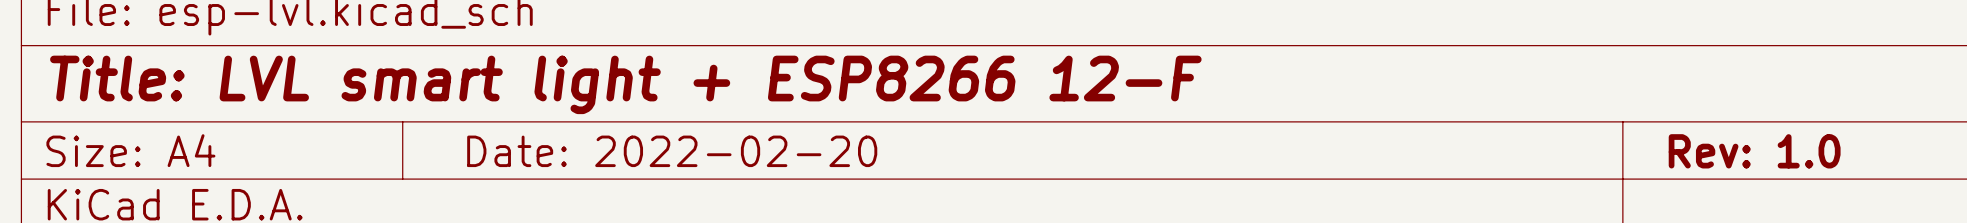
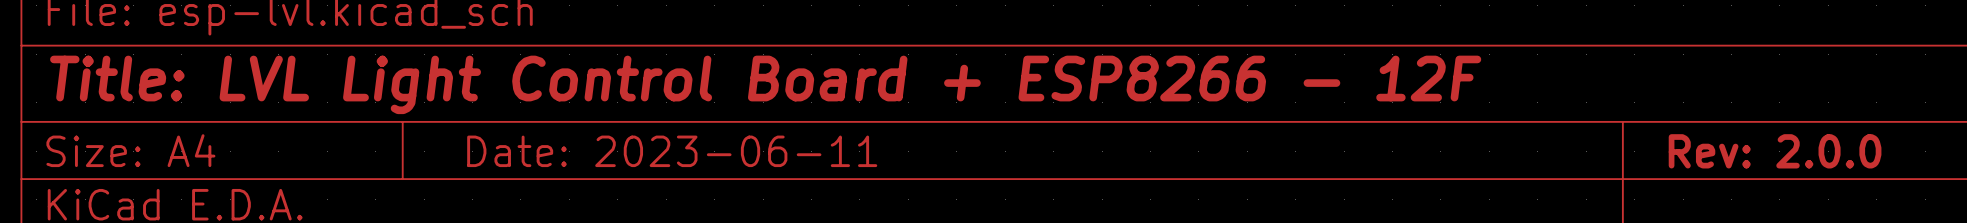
title block: Title: LVL smart light + ESP8266 12-F (625, 84) -> Title: LVL Light Control Board + ESP8266 - 12F (765, 84)
title block: Date: 2022-02-20 (672, 151) -> Date: 2023-06-11 (672, 151)
title block: Rev: 1.0 (1754, 151) -> Rev: 2.0.0 (1775, 151)

